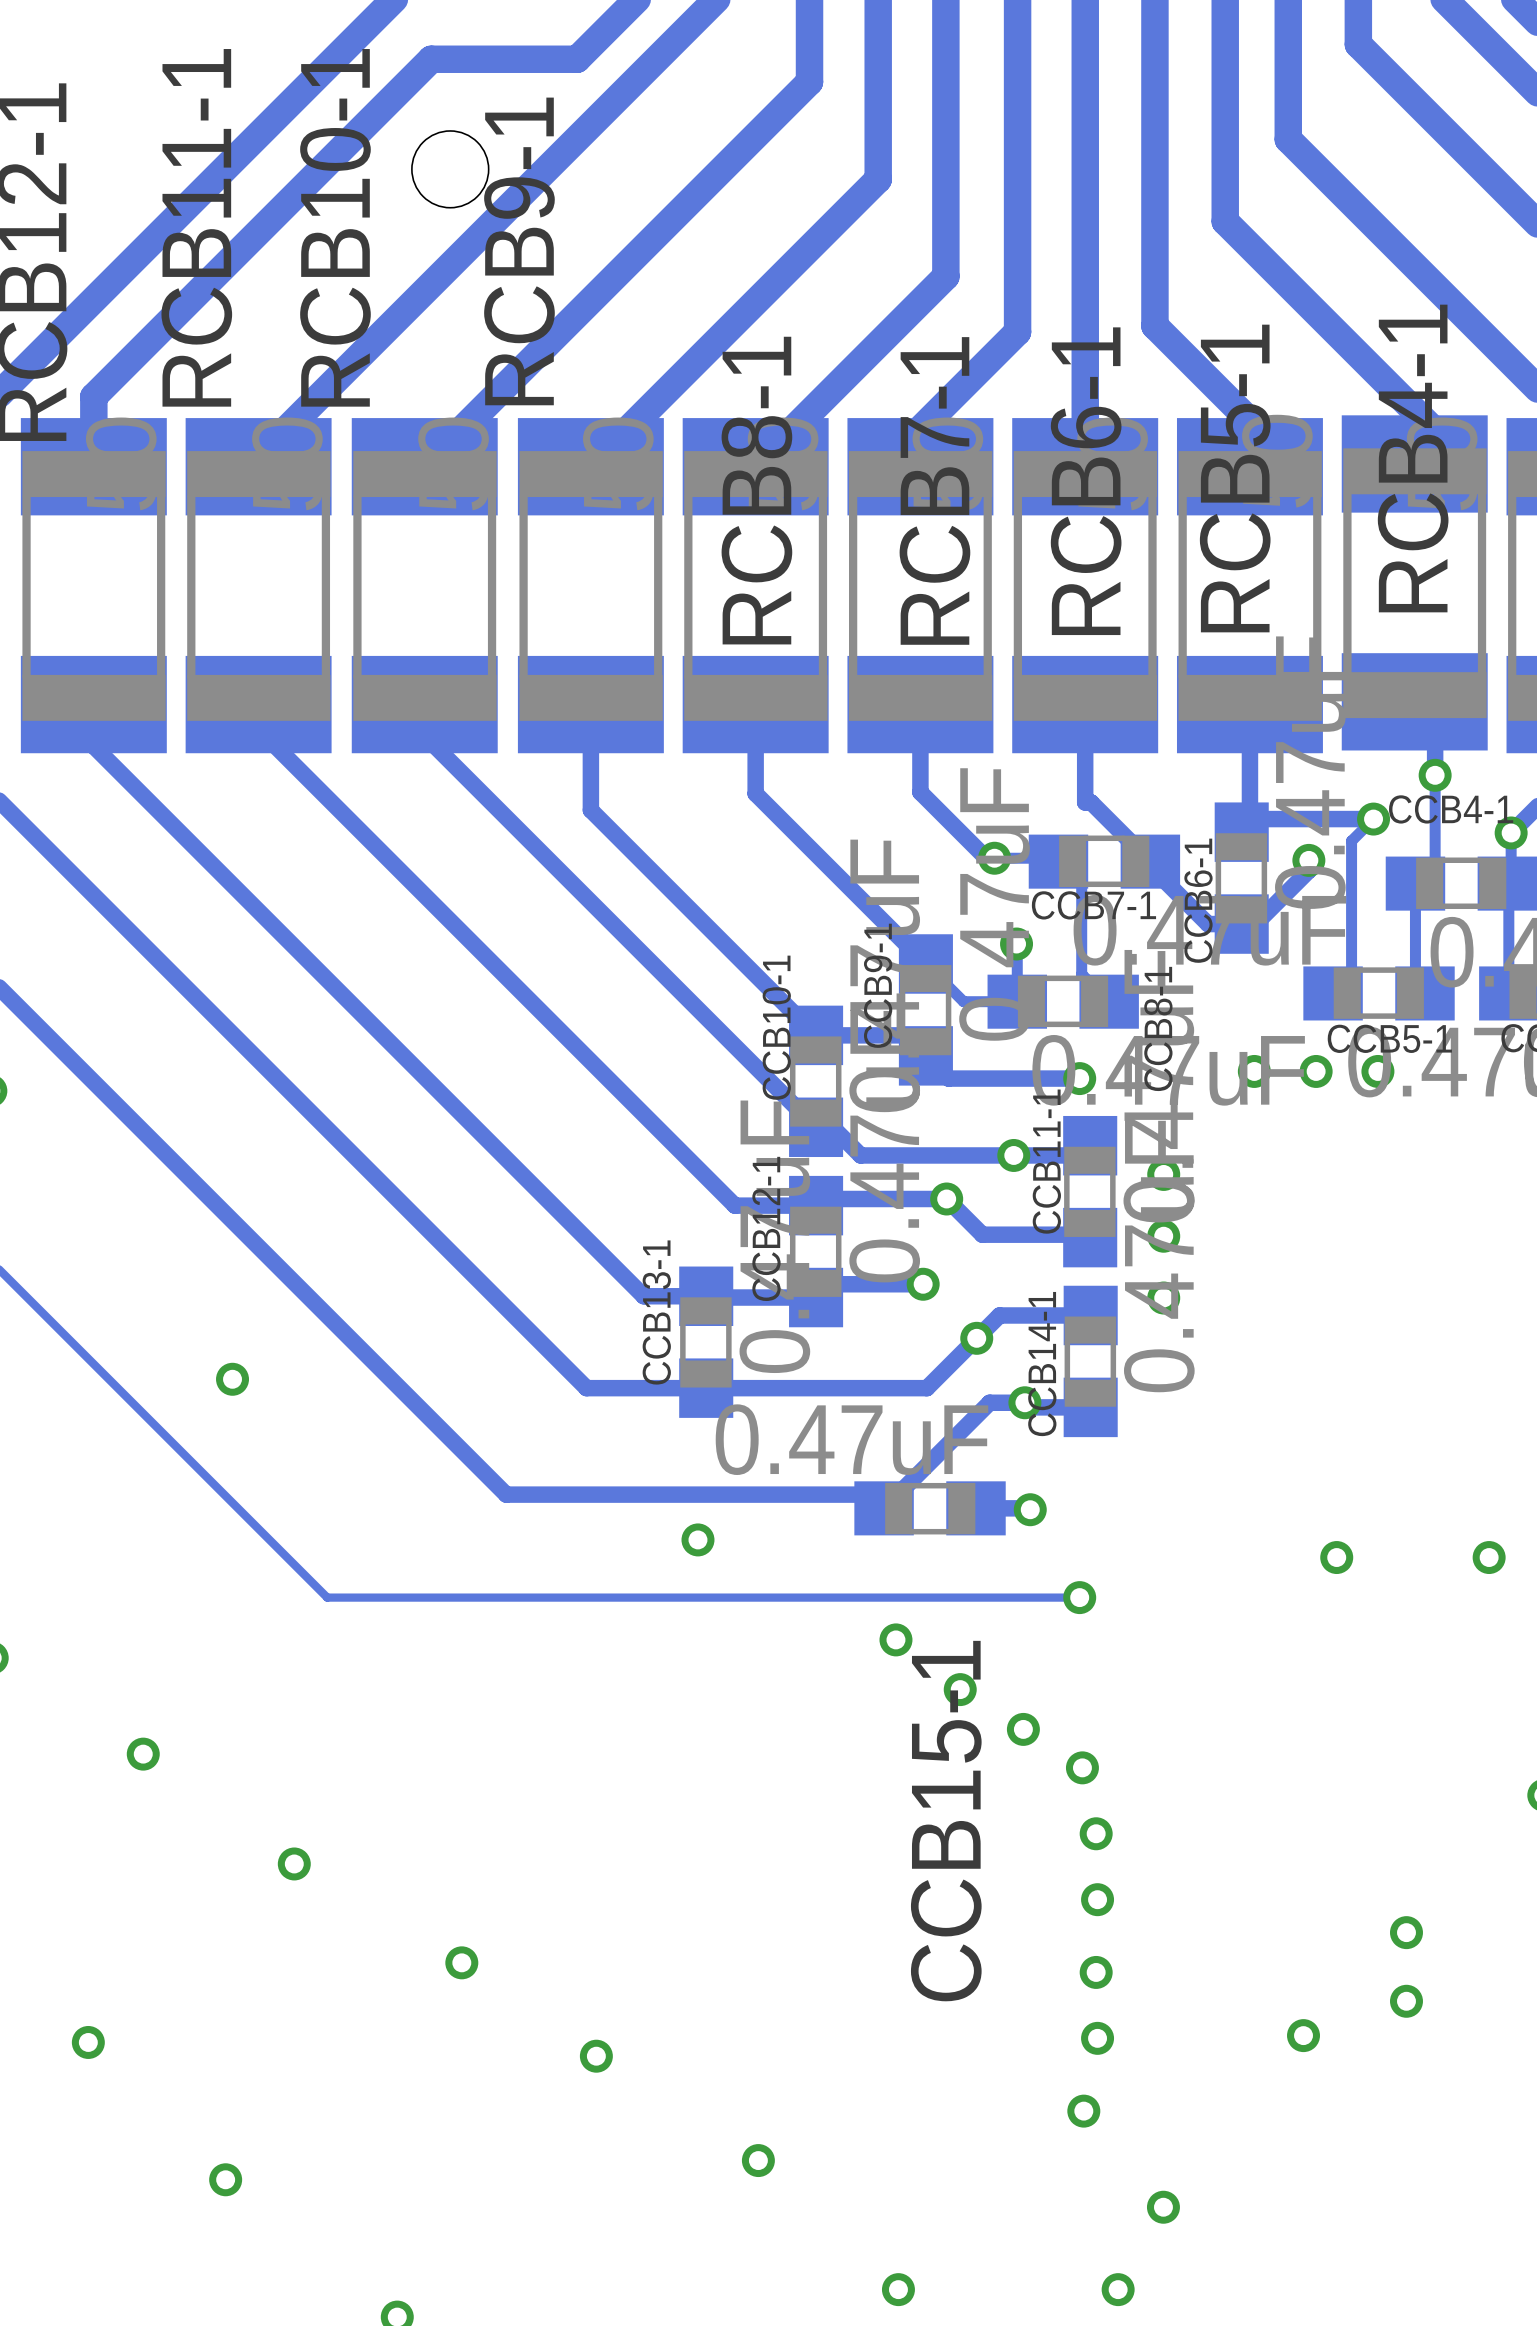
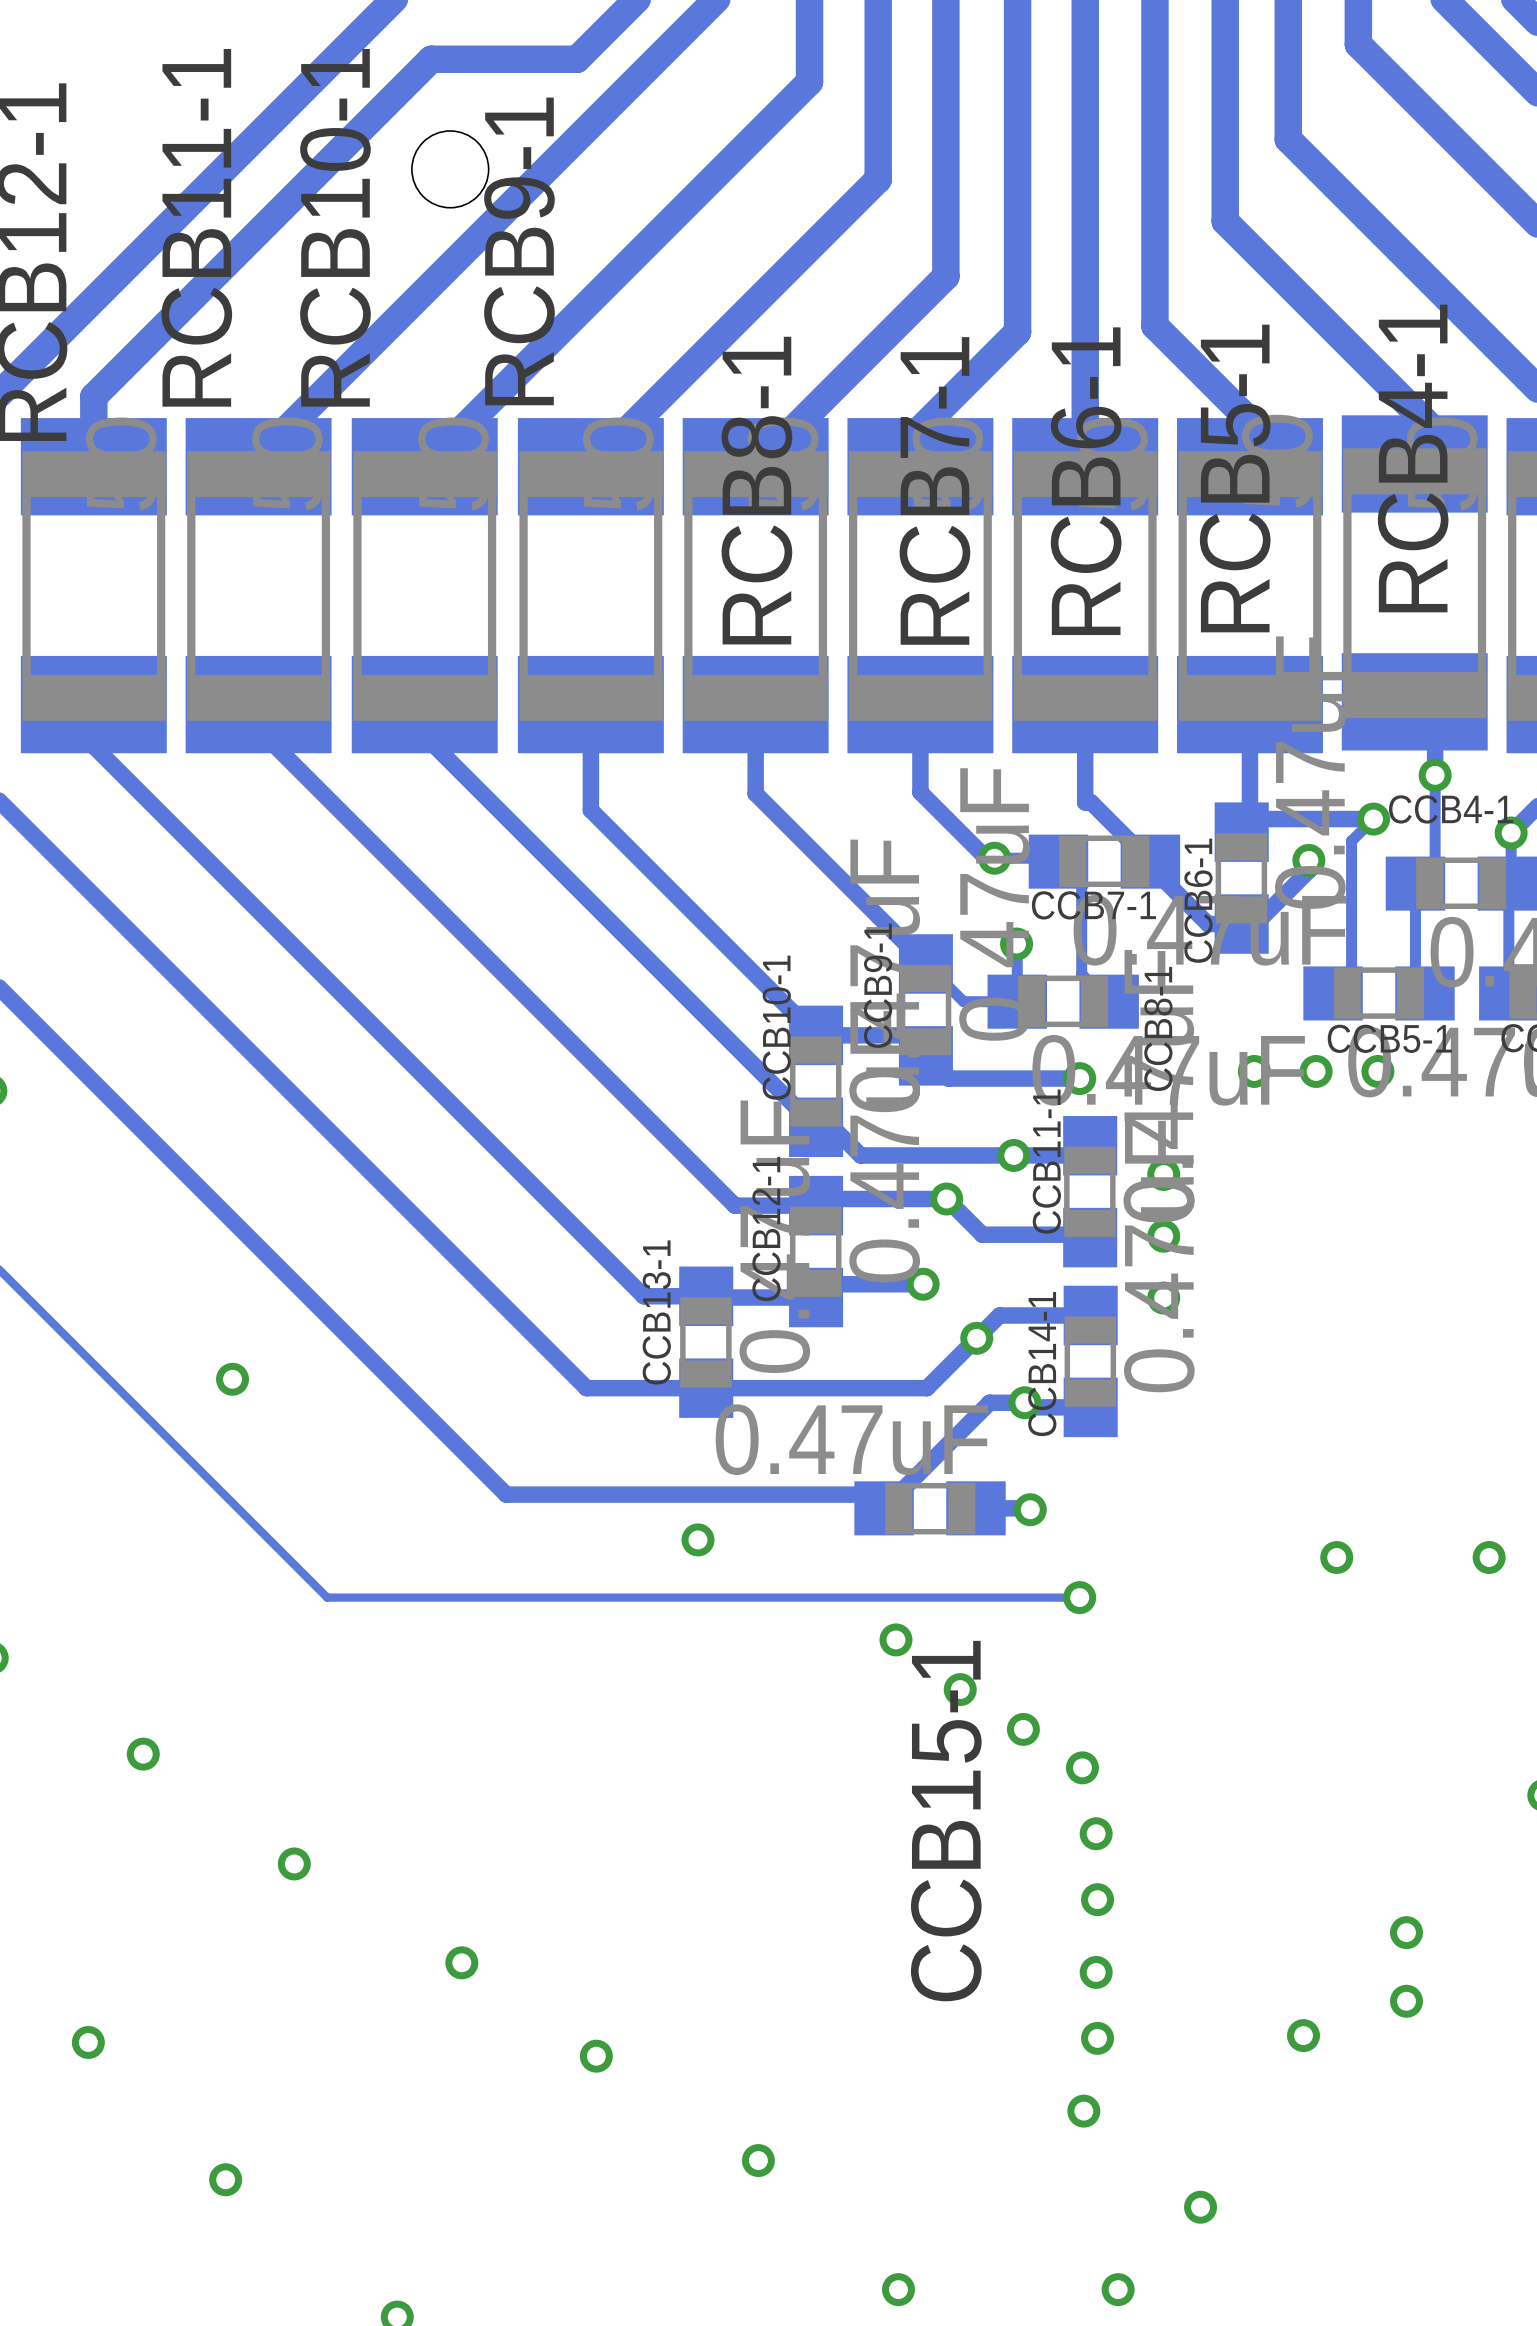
via position: (1163, 2207) -> (1200, 2207)

